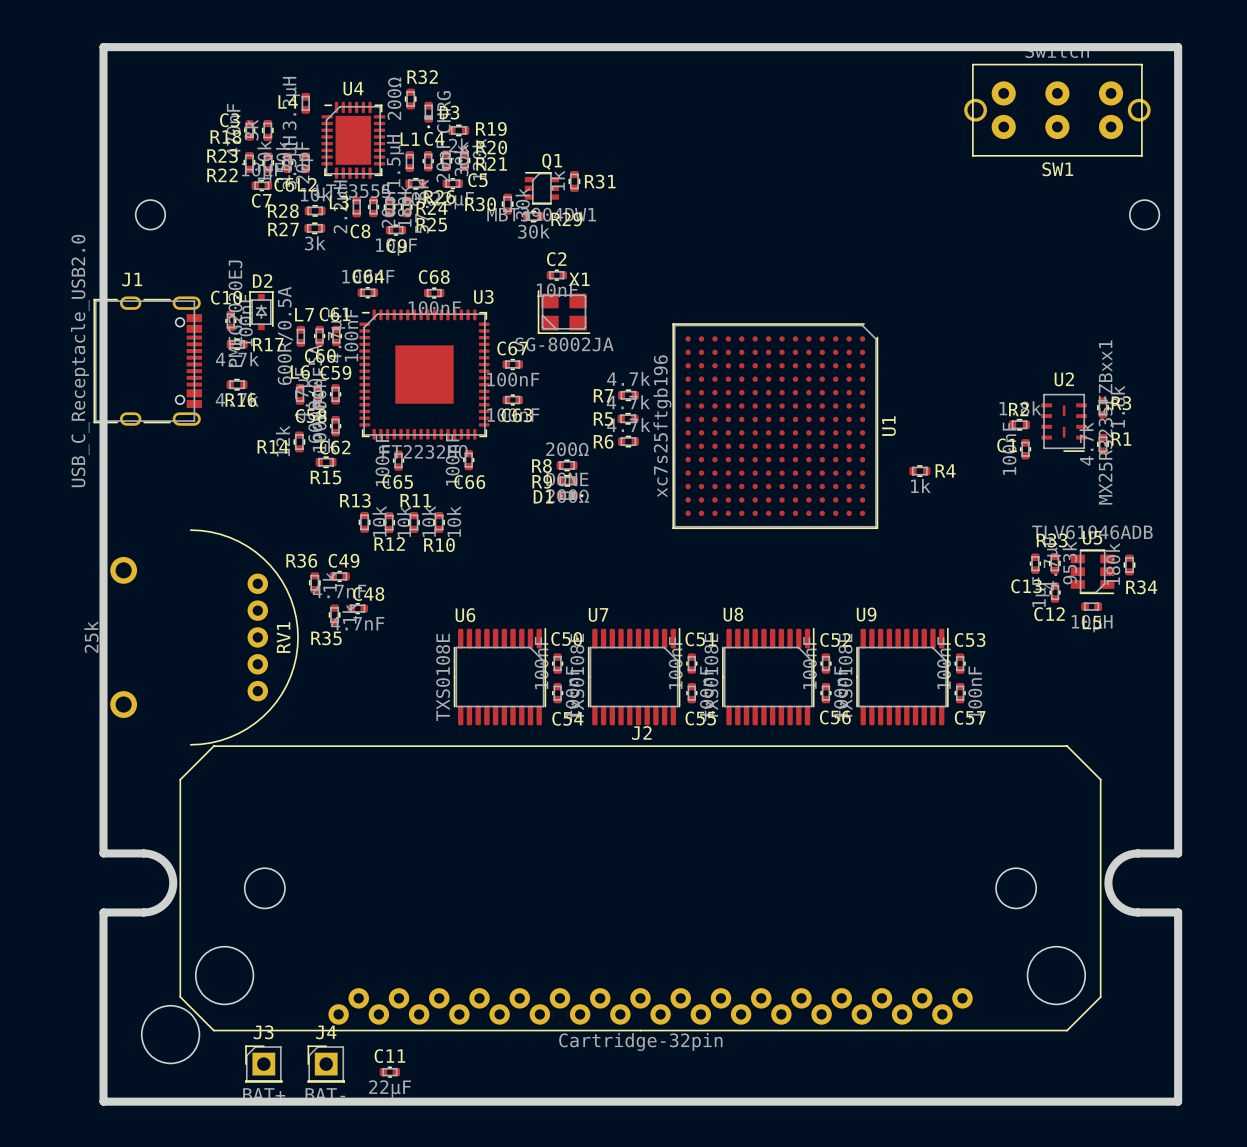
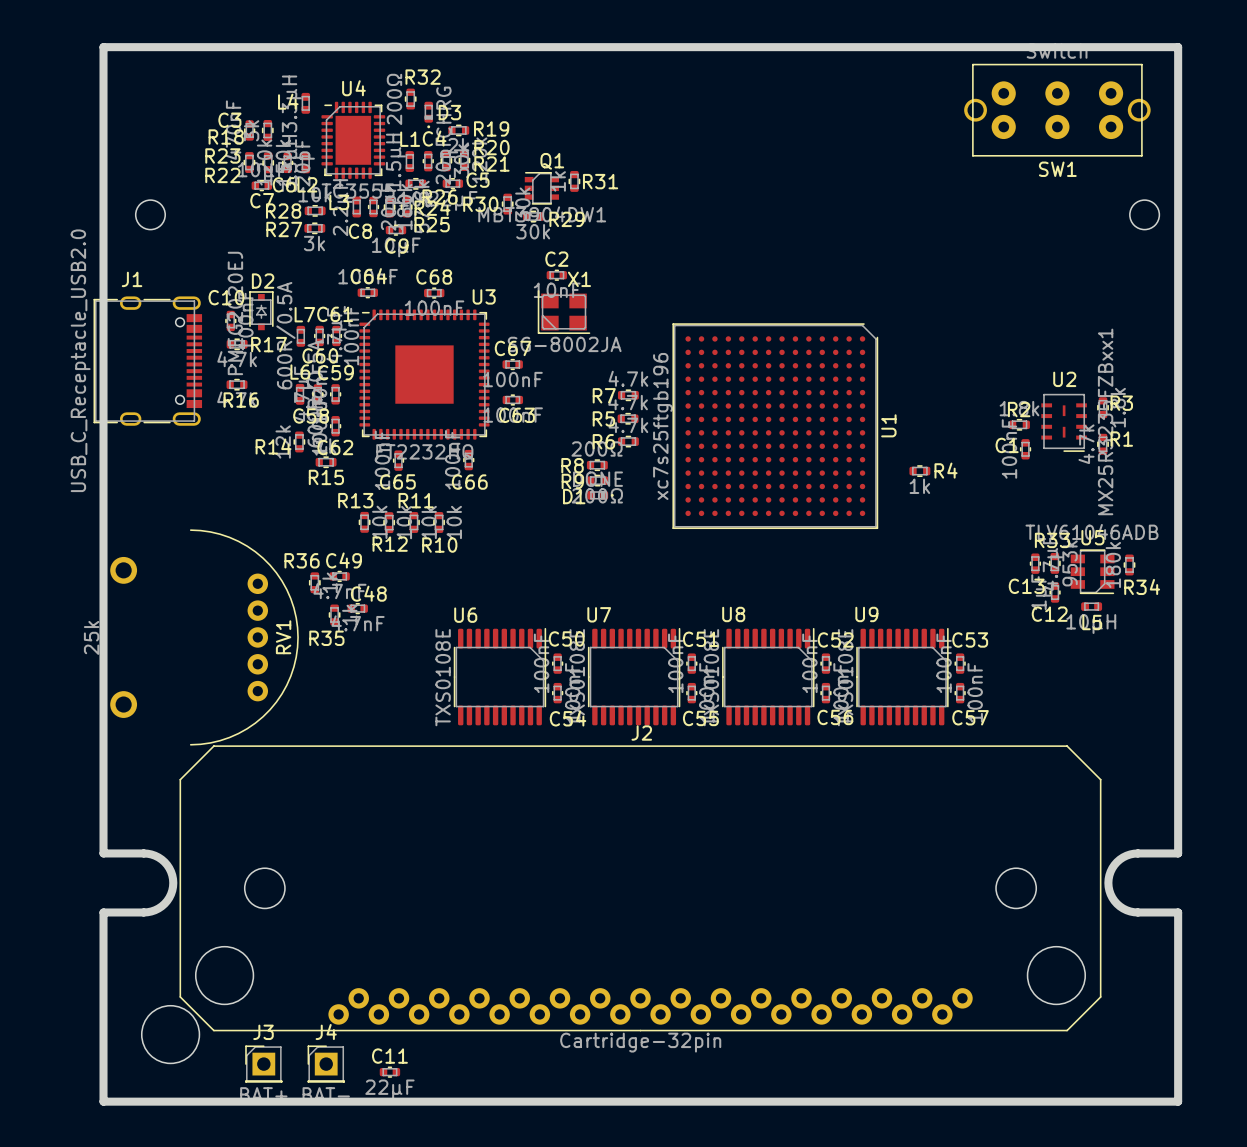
R8 position: (567, 465) -> (597, 465)
R9 position: (567, 480) -> (597, 480)
D1 position: (570, 495) -> (600, 495)

